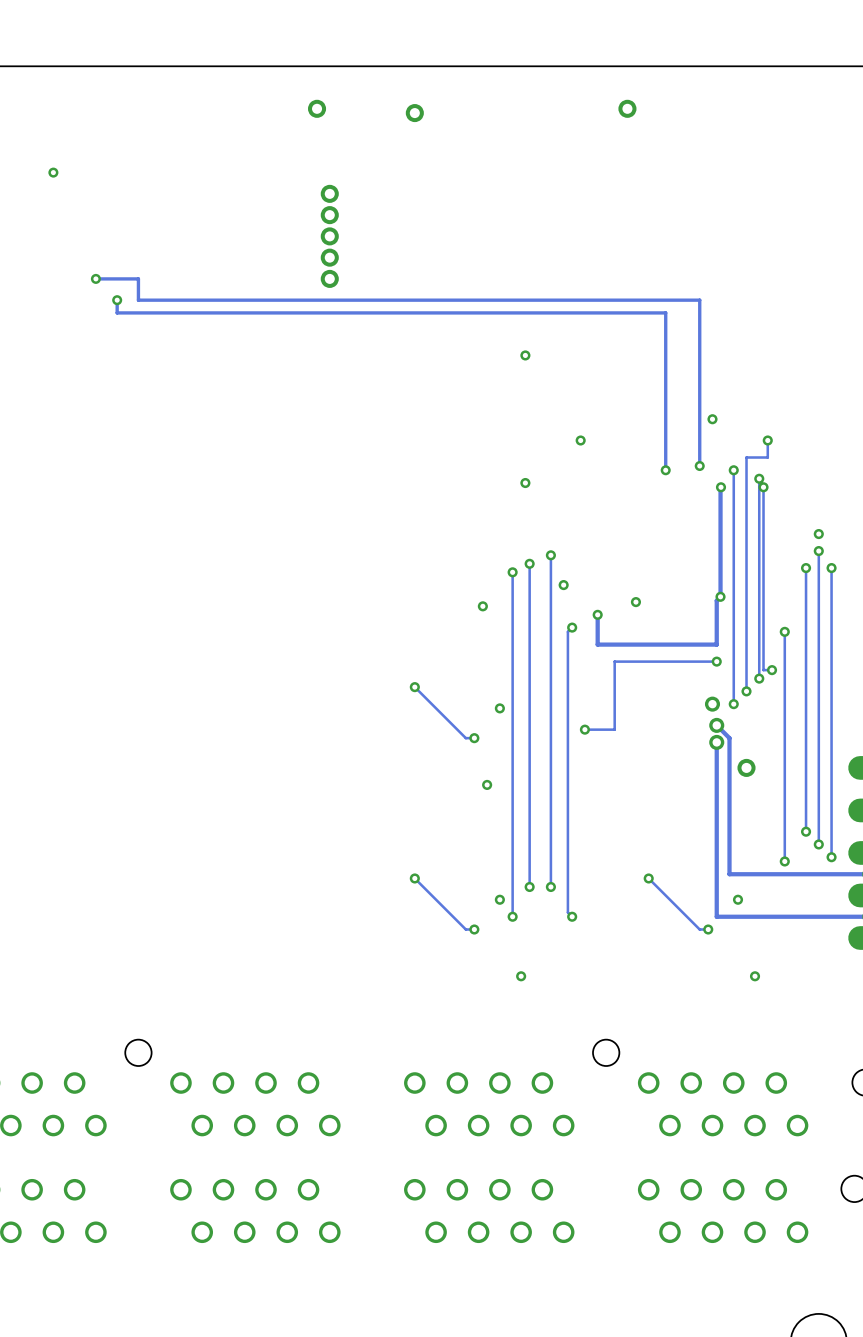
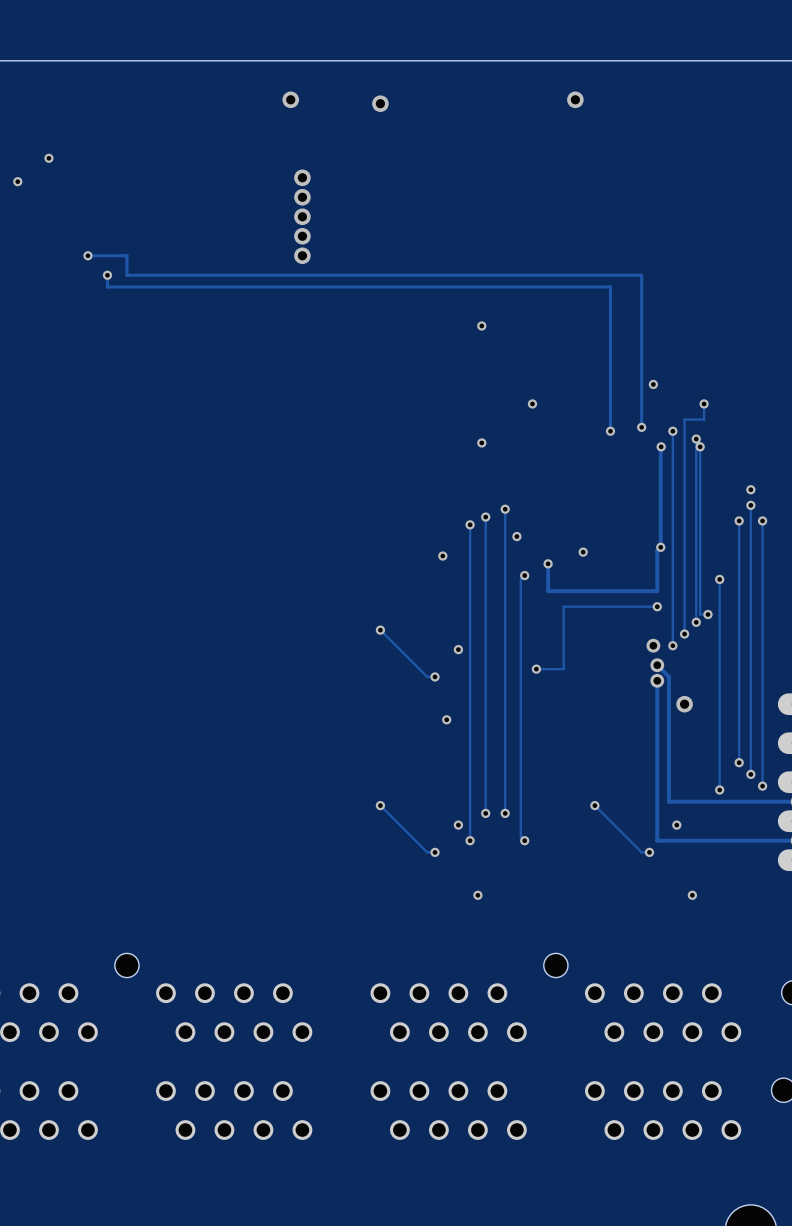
via: none -> (17, 181)

